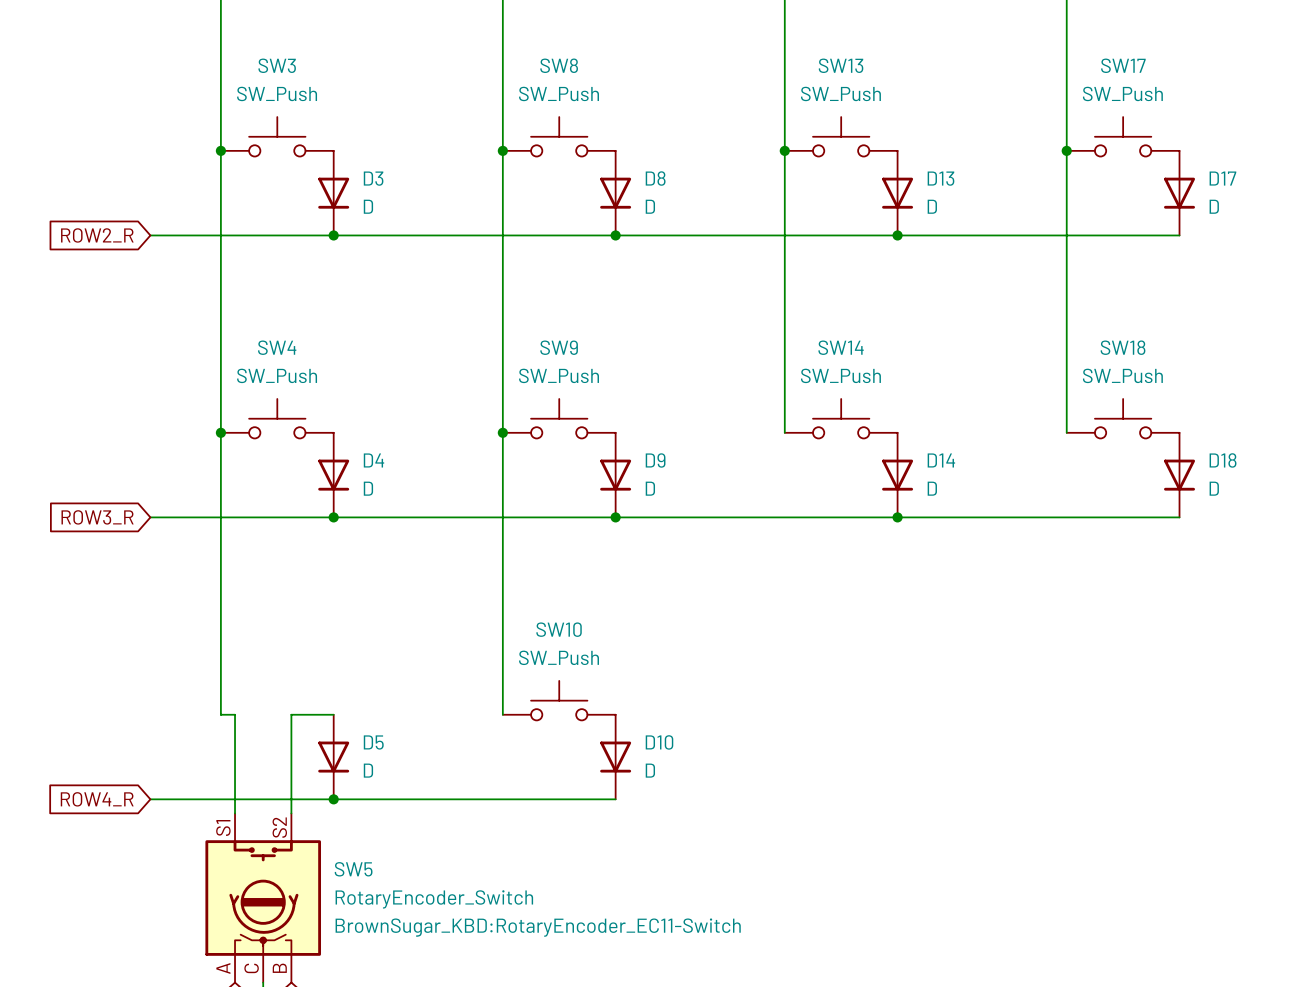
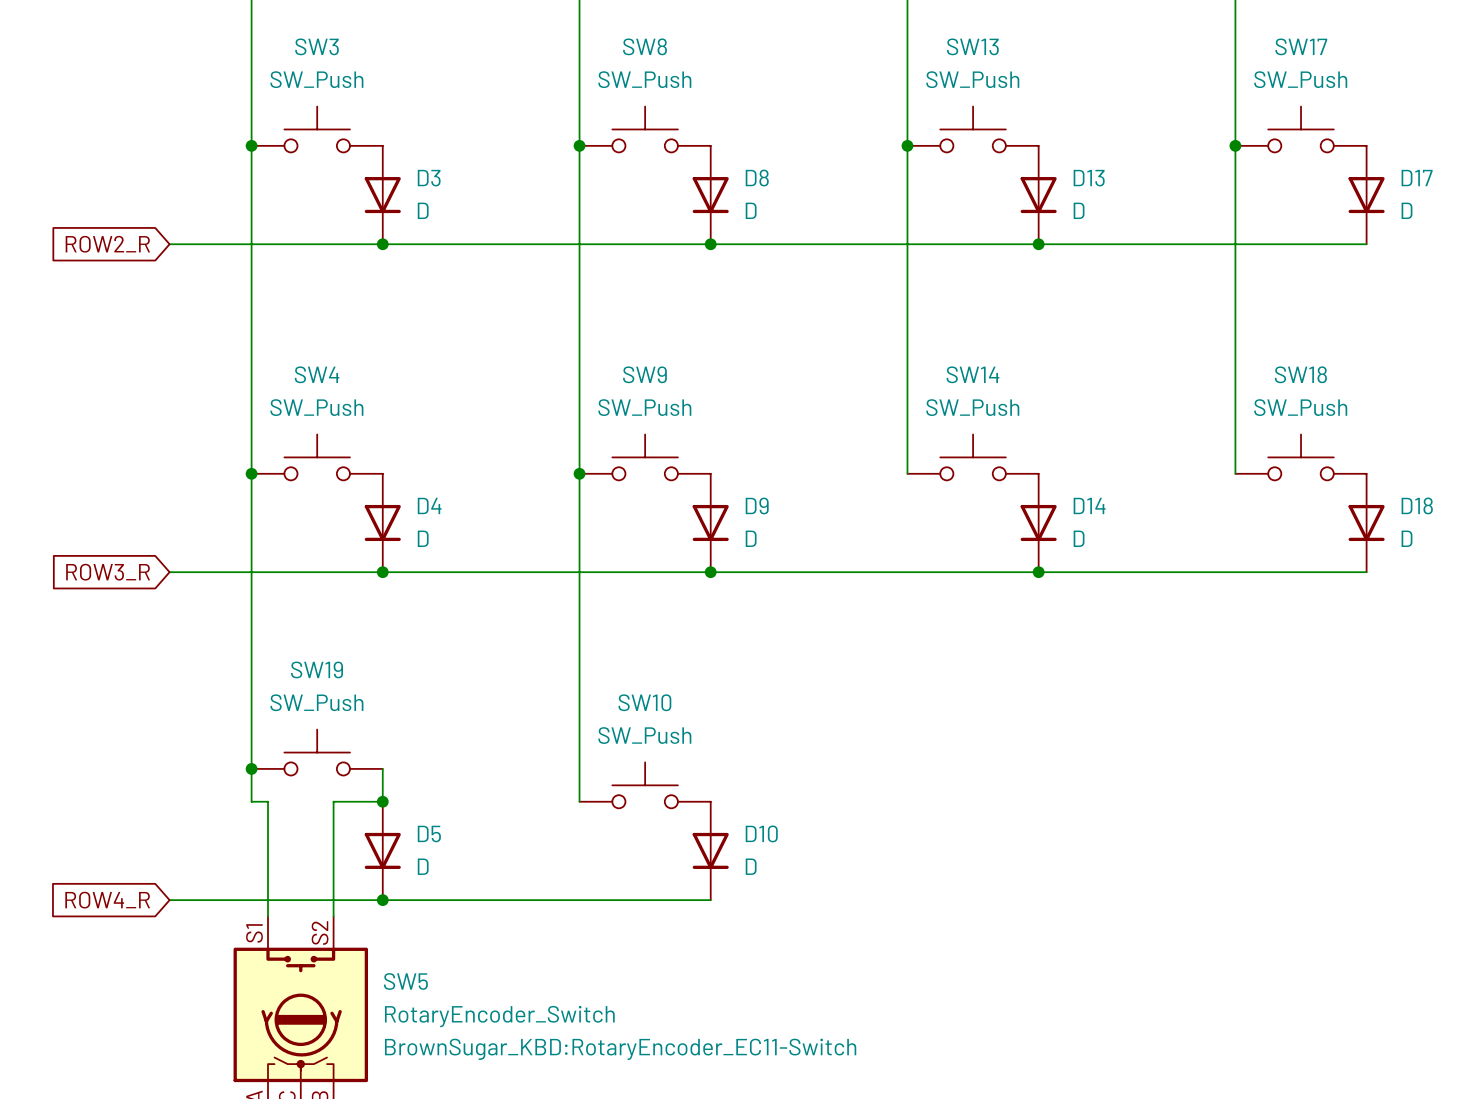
SW19: none -> SW_Push (317, 752)
junction: none -> (251, 768)
wire: none -> (382, 768) (382, 801)
junction: none -> (382, 801)

